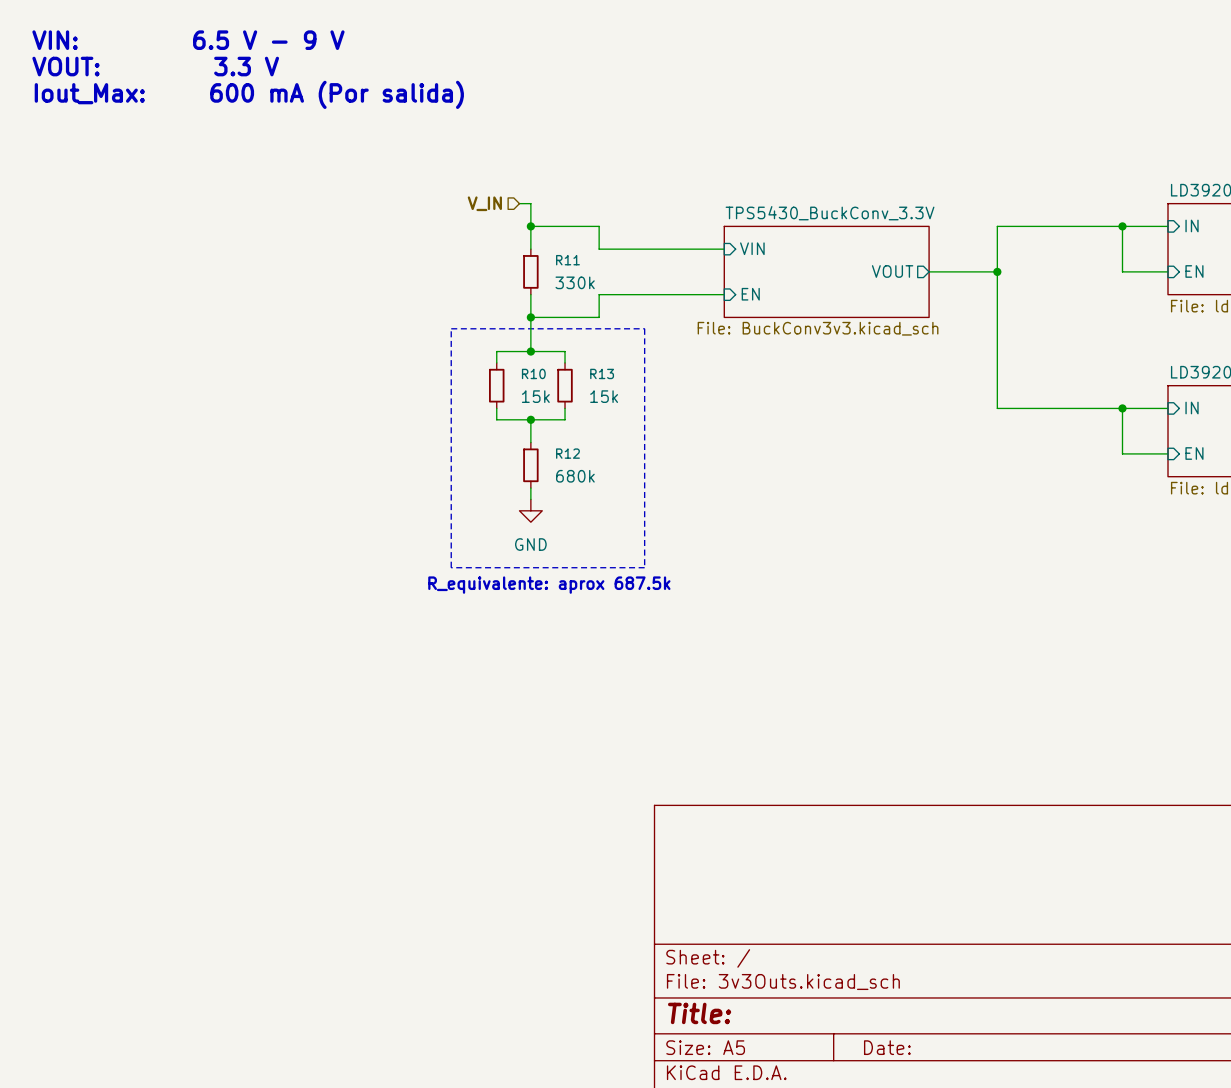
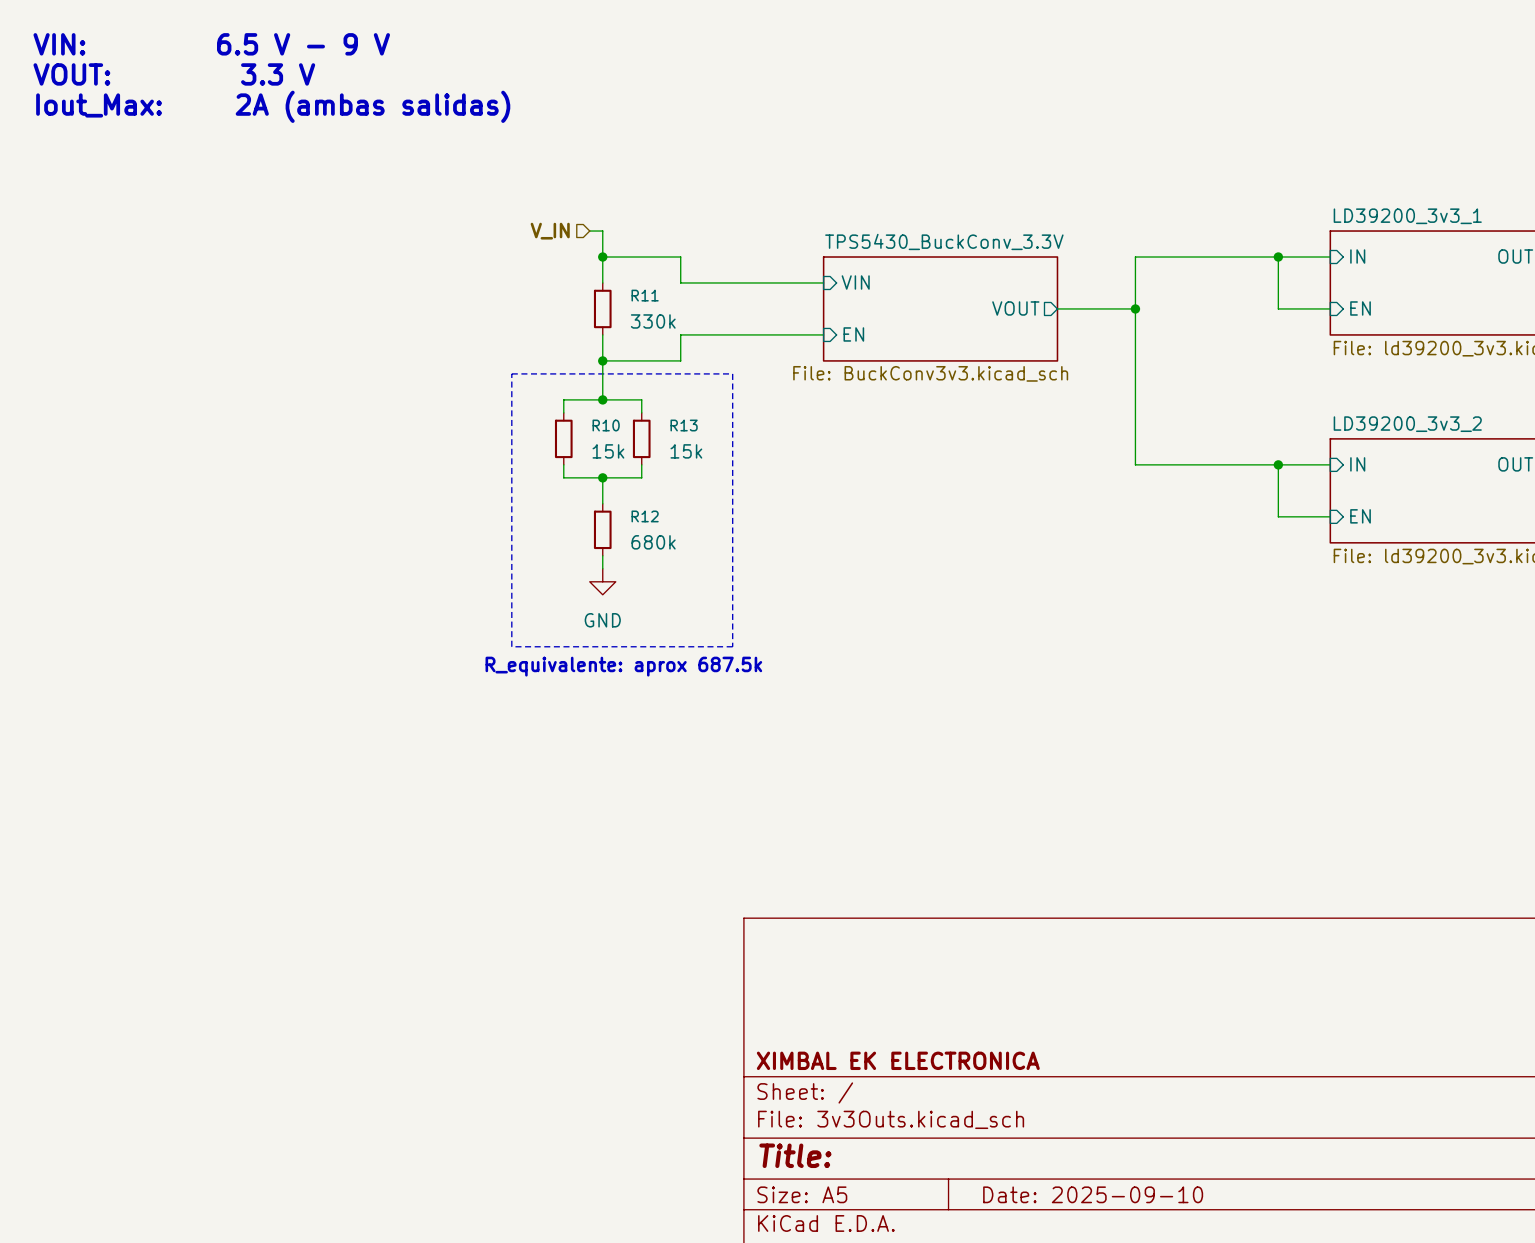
text: Iout_Max: 600 mA (Por salida) (249, 94) -> Iout_Max: 2A (ambas salidas) (273, 106)
title block: none -> XIMBAL EK ELECTRONICA (898, 1060)
title block: Date: (887, 1047) -> Date: 2025-09-10 (1093, 1194)

